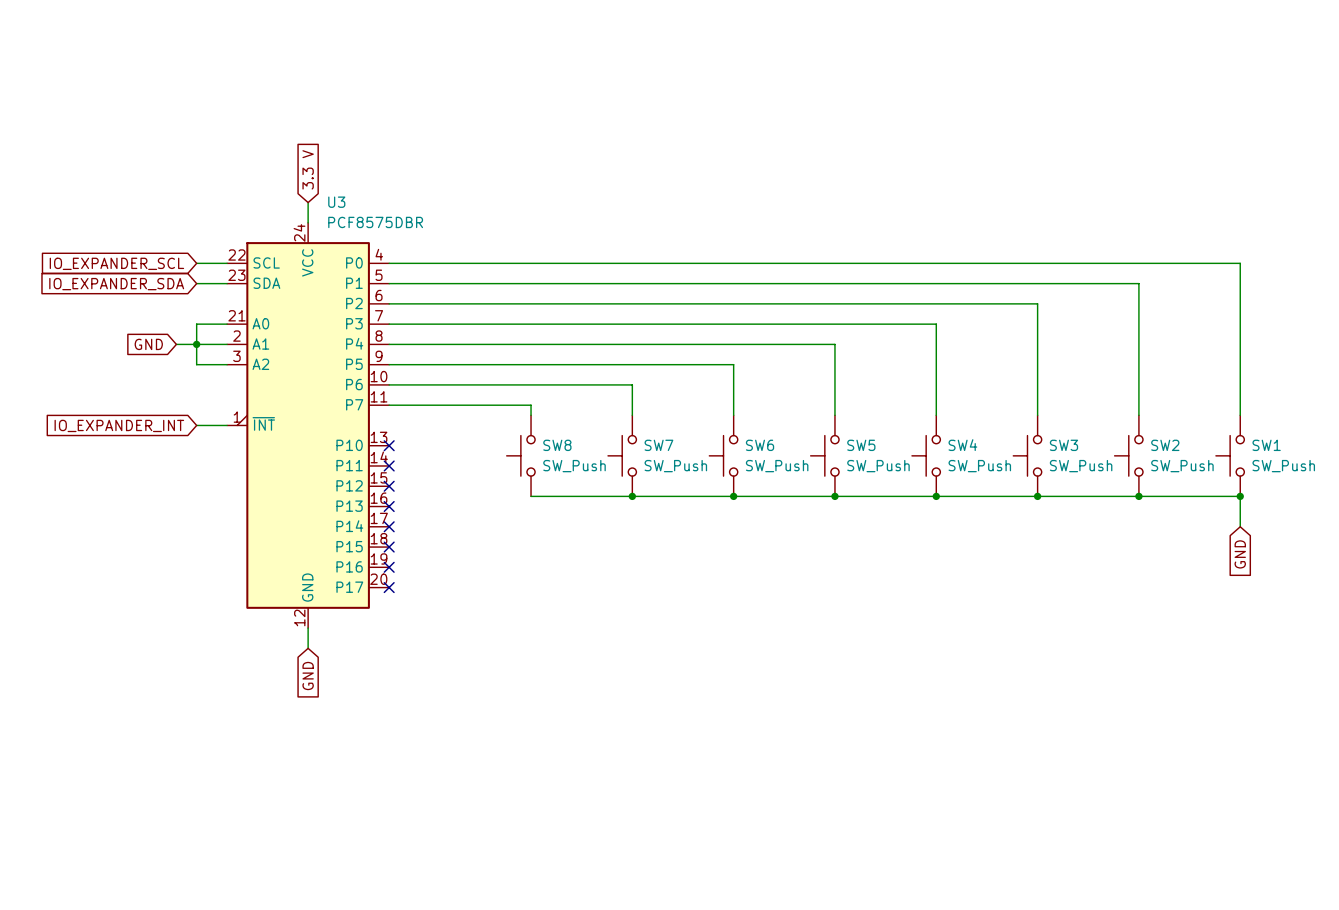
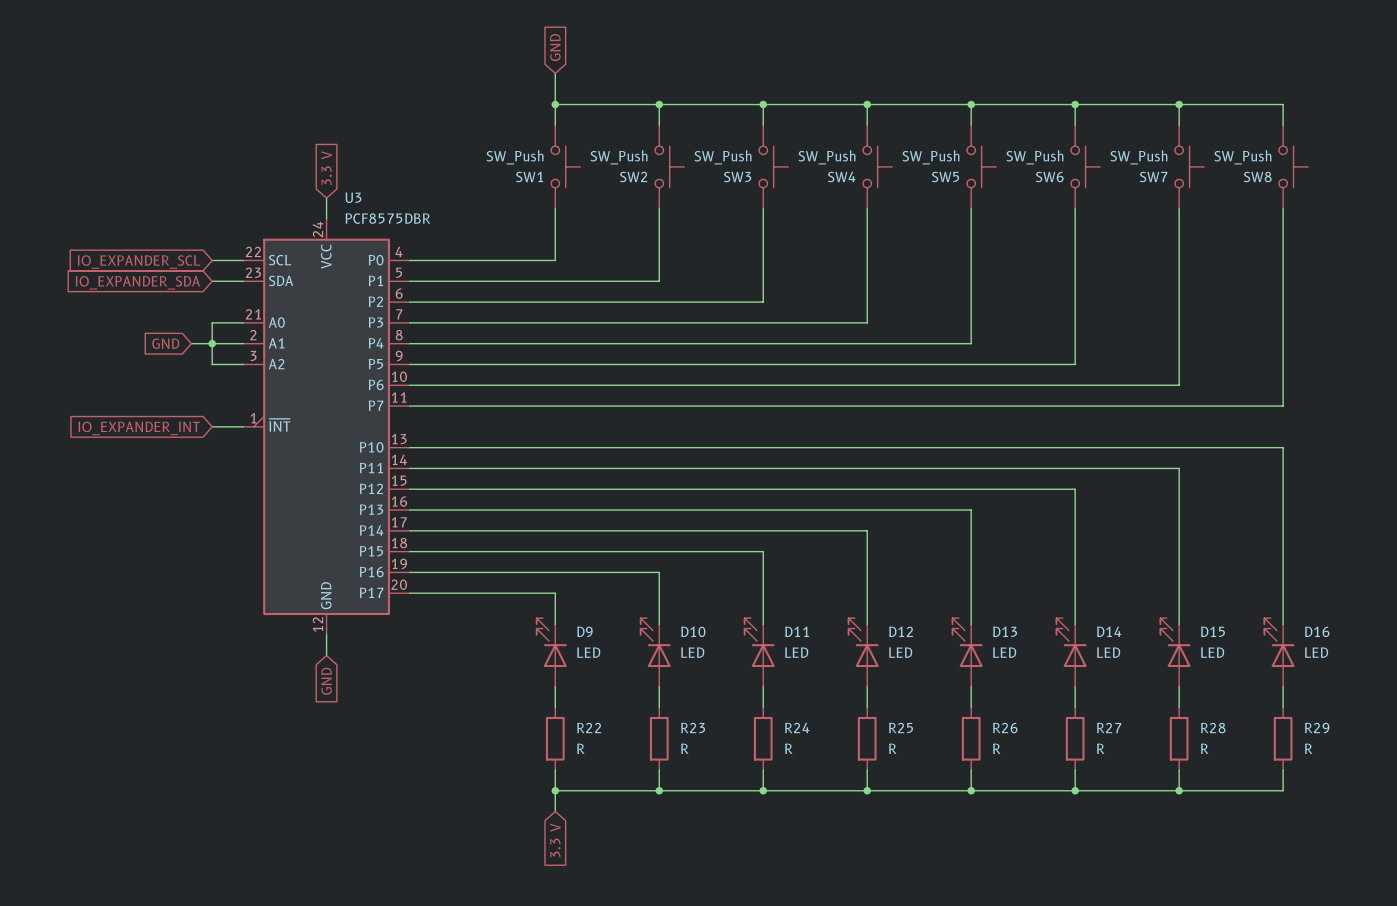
global label: none -> GND (555, 47)
wire: none -> (555, 73) (555, 125)
wire: none -> (555, 104) (1283, 104) (1283, 125)
junction: none -> (555, 104)
wire: none -> (659, 104) (659, 125)
junction: none -> (659, 104)
wire: none -> (763, 104) (763, 125)
junction: none -> (763, 104)
wire: none -> (867, 104) (867, 125)
junction: none -> (867, 104)
wire: none -> (971, 104) (971, 125)
junction: none -> (971, 104)
wire: none -> (1075, 104) (1075, 125)
junction: none -> (1075, 104)
wire: none -> (1179, 104) (1179, 125)
junction: none -> (1179, 104)
wire: none -> (971, 208) (971, 322)
wire: none -> (1075, 208) (1075, 302)
wire: none -> (1179, 208) (1179, 281)
wire: none -> (1283, 208) (1283, 260)
wire: (531, 263) (1240, 263) -> (555, 260) (555, 208)
wire: (632, 283) (1138, 283) -> (659, 281) (659, 208)
wire: (733, 303) (1037, 303) -> (763, 302) (763, 208)
wire: (834, 324) (936, 324) -> (867, 322) (867, 208)
wire: (834, 344) (834, 415) -> (867, 343) (971, 343)
wire: (936, 344) (936, 415) -> none
wire: (733, 364) (733, 415) -> (763, 364) (1075, 364)
wire: (1037, 364) (1037, 415) -> none
wire: (632, 384) (632, 415) -> (659, 385) (1179, 385)
wire: (1138, 384) (1138, 415) -> none
wire: (531, 405) (531, 415) -> (555, 406) (1283, 406)
wire: (1240, 405) (1240, 415) -> none
no-connect mark: (389, 445) -> none
SW8 rotation: 0° (520, 455) -> 180° (1293, 166)
SW8 position: (520, 455) -> (1293, 166)
SW7 rotation: 0° (622, 455) -> 180° (1189, 166)
SW7 position: (622, 455) -> (1189, 166)
SW6 rotation: 0° (723, 455) -> 180° (1085, 166)
SW6 position: (723, 455) -> (1085, 166)
SW5 rotation: 0° (824, 455) -> 180° (981, 166)
SW5 position: (824, 455) -> (981, 166)
SW4 rotation: 0° (926, 455) -> 180° (877, 166)
SW4 position: (926, 455) -> (877, 166)
SW3 rotation: 0° (1027, 455) -> 180° (773, 166)
SW3 position: (1027, 455) -> (773, 166)
SW2 rotation: 0° (1128, 455) -> 180° (669, 166)
SW2 position: (1128, 455) -> (669, 166)
SW1 rotation: 0° (1230, 455) -> 180° (565, 166)
SW1 position: (1230, 455) -> (565, 166)
wire: none -> (409, 468) (1179, 468) (1179, 624)
no-connect mark: (389, 465) -> none
wire: none -> (409, 489) (1075, 489) (1075, 624)
no-connect mark: (389, 486) -> none
wire: (531, 496) (1240, 496) -> (409, 447) (1283, 447) (1283, 499)
junction: (632, 496) -> none
junction: (733, 496) -> none
junction: (834, 496) -> none
junction: (936, 496) -> none
junction: (1037, 496) -> none
junction: (1138, 496) -> none
junction: (1240, 496) -> none
wire: none -> (409, 510) (971, 510) (971, 624)
no-connect mark: (389, 506) -> none
wire: none -> (409, 530) (867, 530) (867, 624)
no-connect mark: (389, 526) -> none
wire: none -> (1283, 530) (1283, 624)
wire: none -> (409, 551) (763, 551) (763, 624)
no-connect mark: (389, 547) -> none
global label: GND (1240, 554) -> none
wire: none -> (409, 572) (659, 572) (659, 624)
no-connect mark: (389, 567) -> none
wire: none -> (409, 593) (555, 593) (555, 624)
no-connect mark: (389, 587) -> none
D9: none -> LED (551, 652)
D10: none -> LED (655, 652)
D11: none -> LED (759, 652)
D12: none -> LED (863, 652)
D13: none -> LED (967, 652)
D14: none -> LED (1071, 652)
D15: none -> LED (1175, 652)
D16: none -> LED (1279, 652)
wire: none -> (555, 686) (555, 707)
wire: none -> (659, 686) (659, 707)
wire: none -> (763, 686) (763, 707)
wire: none -> (867, 686) (867, 707)
wire: none -> (971, 686) (971, 707)
wire: none -> (1075, 686) (1075, 707)
wire: none -> (1179, 686) (1179, 707)
wire: none -> (1283, 686) (1283, 707)
R22: none -> R (555, 738)
R23: none -> R (659, 738)
R24: none -> R (763, 738)
R25: none -> R (867, 738)
R26: none -> R (971, 738)
R27: none -> R (1075, 738)
R28: none -> R (1179, 738)
R29: none -> R (1283, 738)
wire: none -> (555, 769) (555, 811)
wire: none -> (659, 769) (659, 790)
wire: none -> (763, 769) (763, 790)
wire: none -> (867, 769) (867, 790)
wire: none -> (971, 769) (971, 790)
wire: none -> (1075, 769) (1075, 790)
wire: none -> (1179, 769) (1179, 790)
wire: none -> (1283, 769) (1283, 790) (555, 790)
junction: none -> (555, 790)
junction: none -> (659, 790)
junction: none -> (763, 790)
junction: none -> (867, 790)
junction: none -> (971, 790)
junction: none -> (1075, 790)
junction: none -> (1179, 790)
global label: none -> 3.3 V (555, 840)

